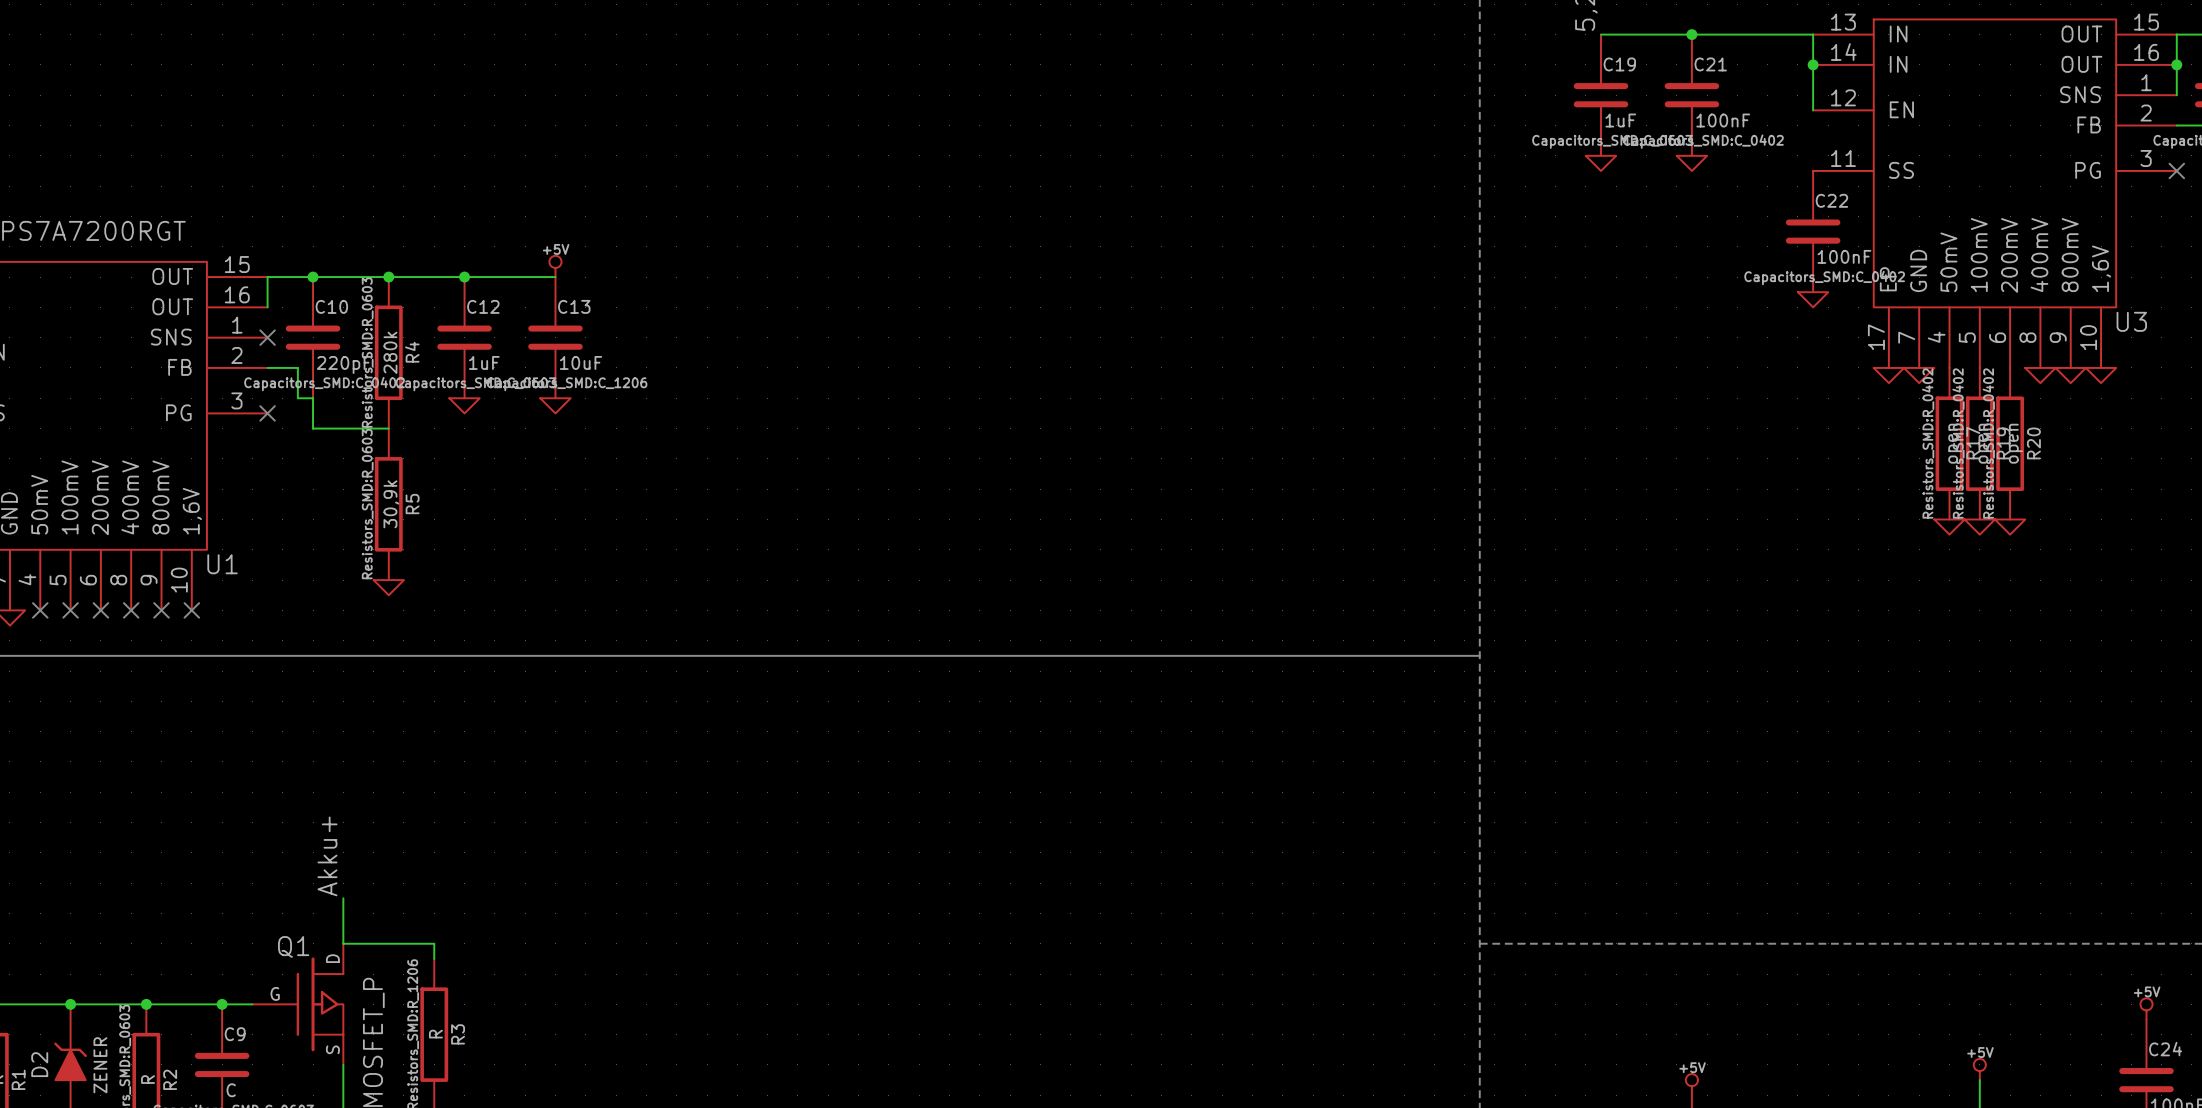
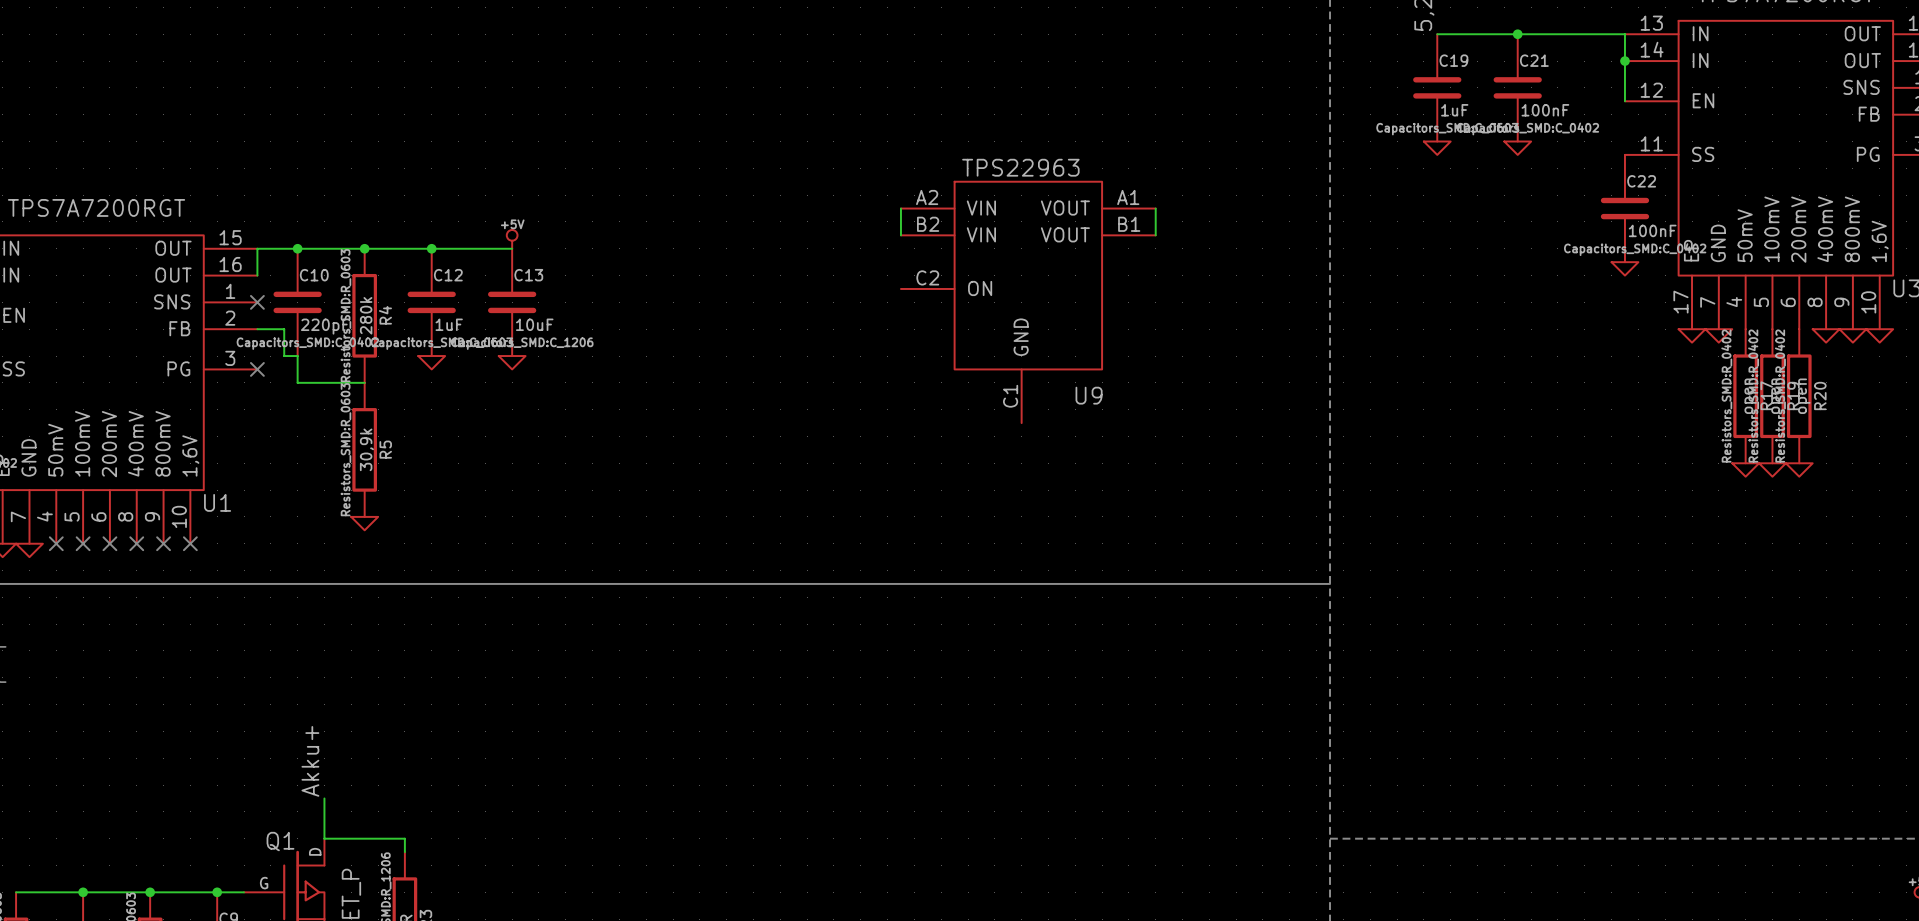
wire: none -> (900, 208) (900, 235)
wire: none -> (1155, 208) (1155, 235)
U9: none -> TPS22963 (1028, 302)

